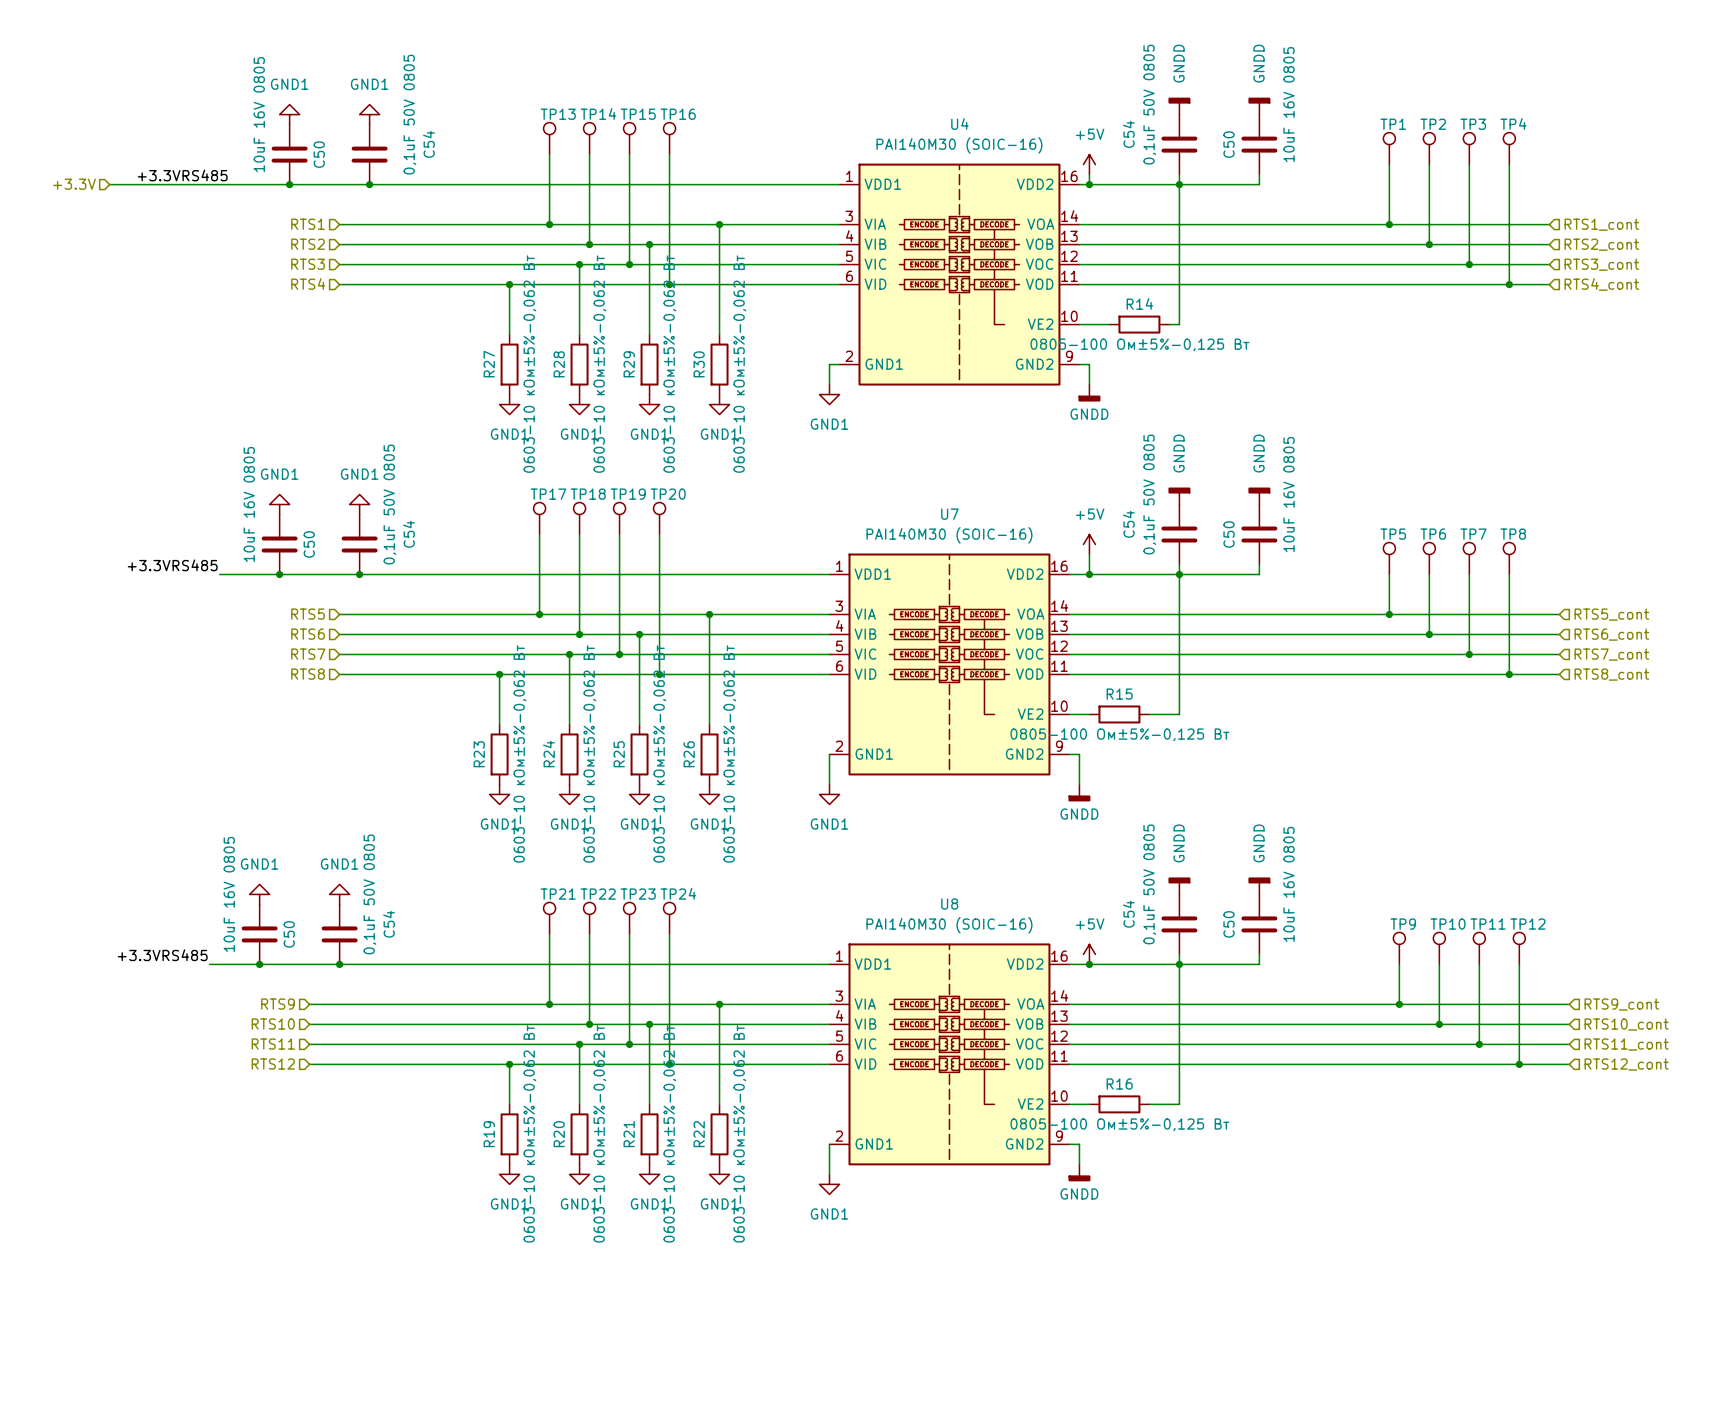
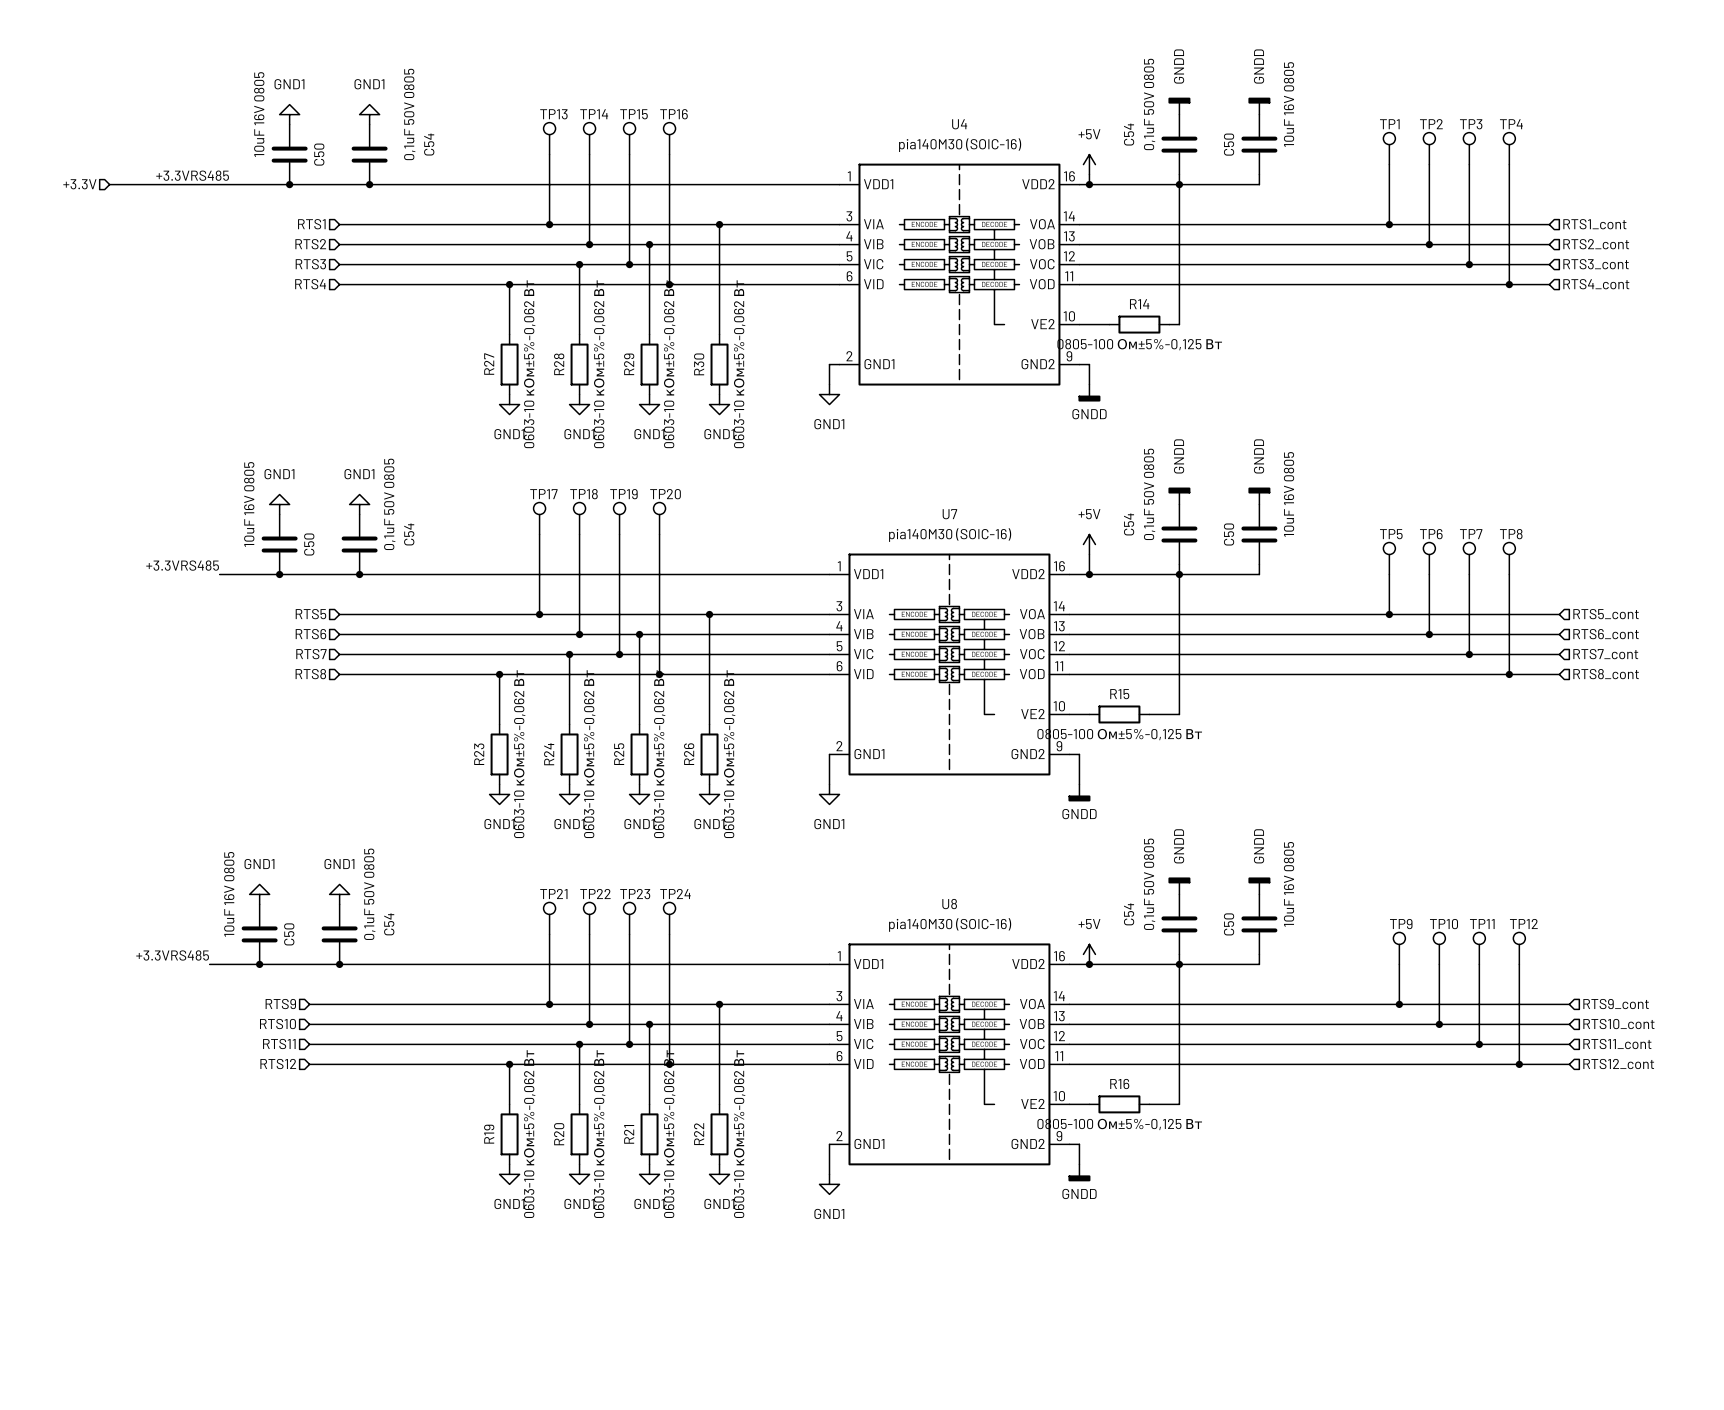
U4 value: PAI140M30 (SOIC-16) (959, 145) -> pia140M30 (SOIC-16) (960, 145)
U7 value: PAI140M30 (SOIC-16) (949, 535) -> pia140M30 (SOIC-16) (950, 535)
U8 value: PAI140M30 (SOIC-16) (949, 925) -> pia140M30 (SOIC-16) (950, 924)

